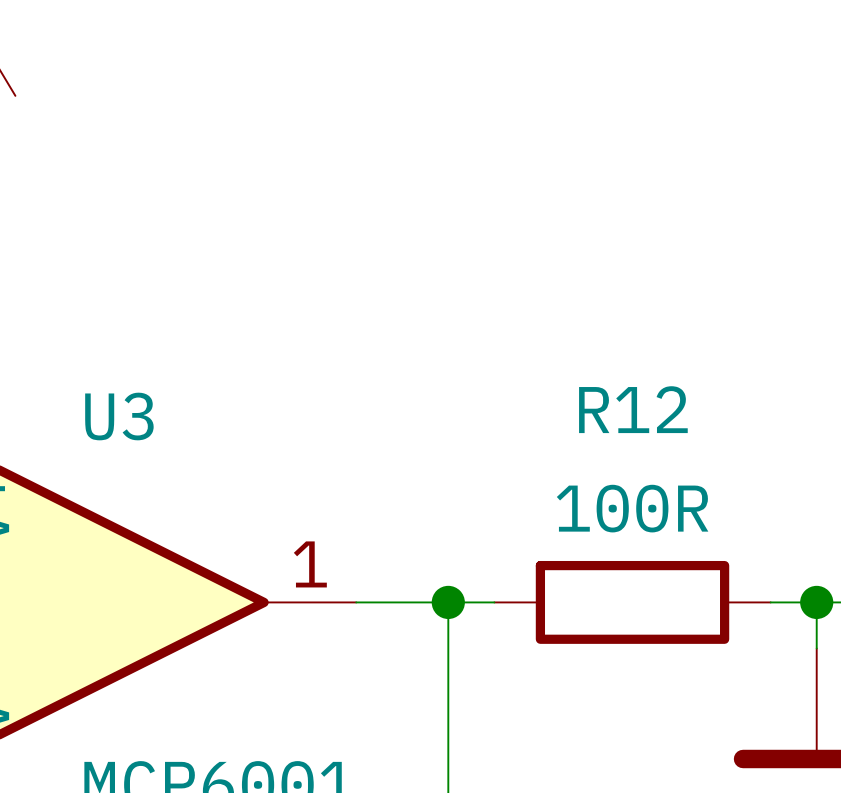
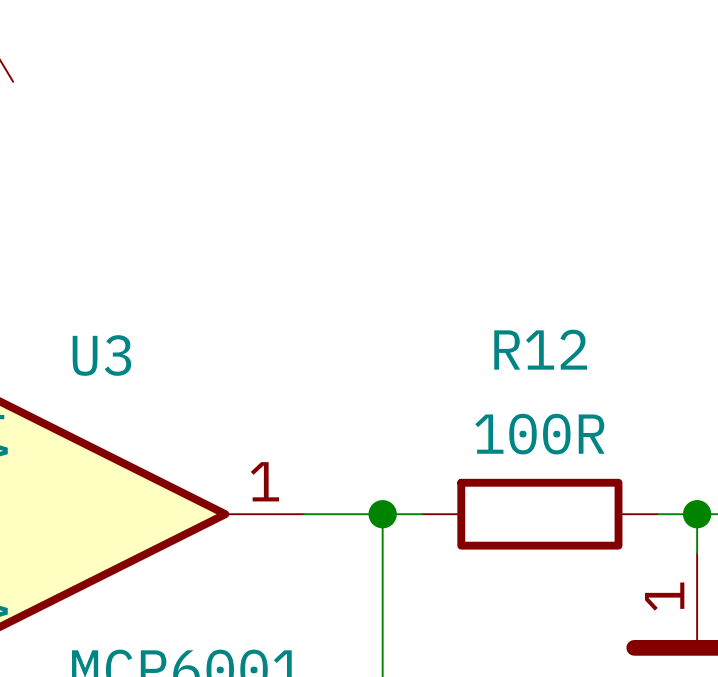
part pin number: none -> 1 (664, 596)

